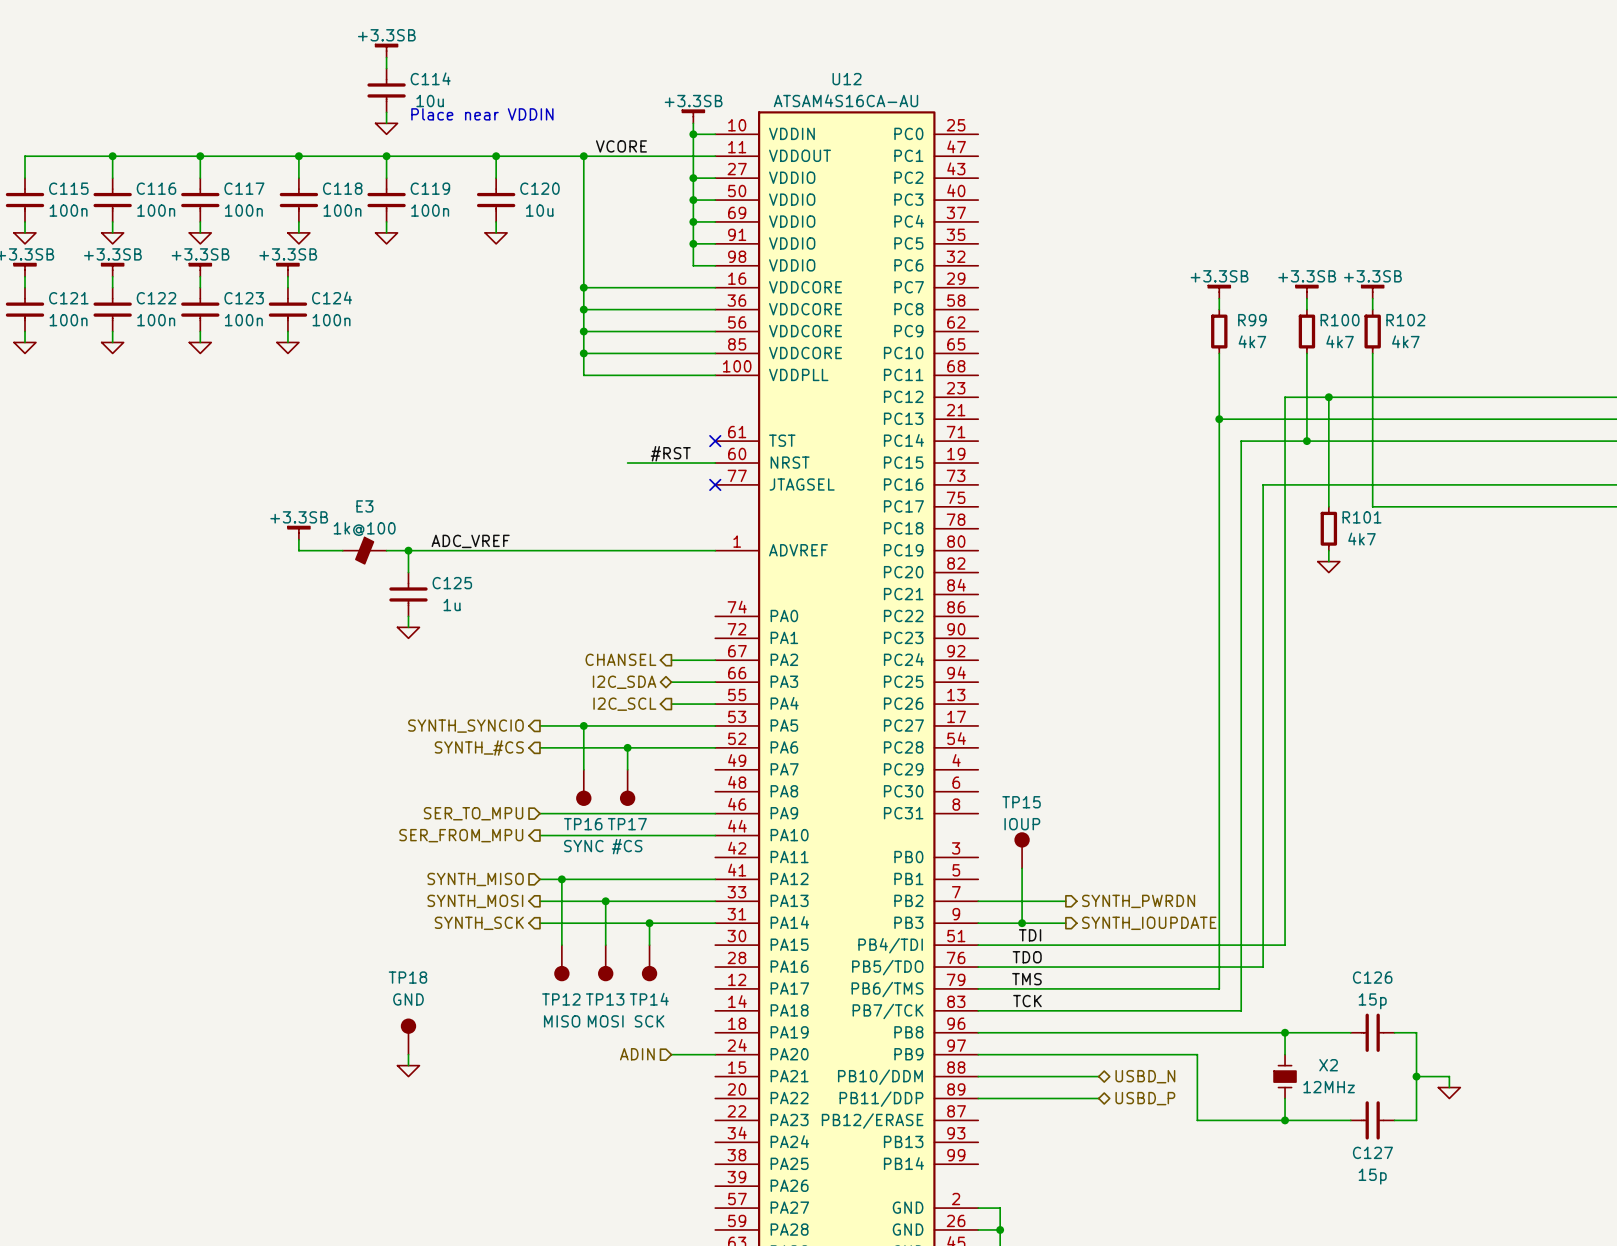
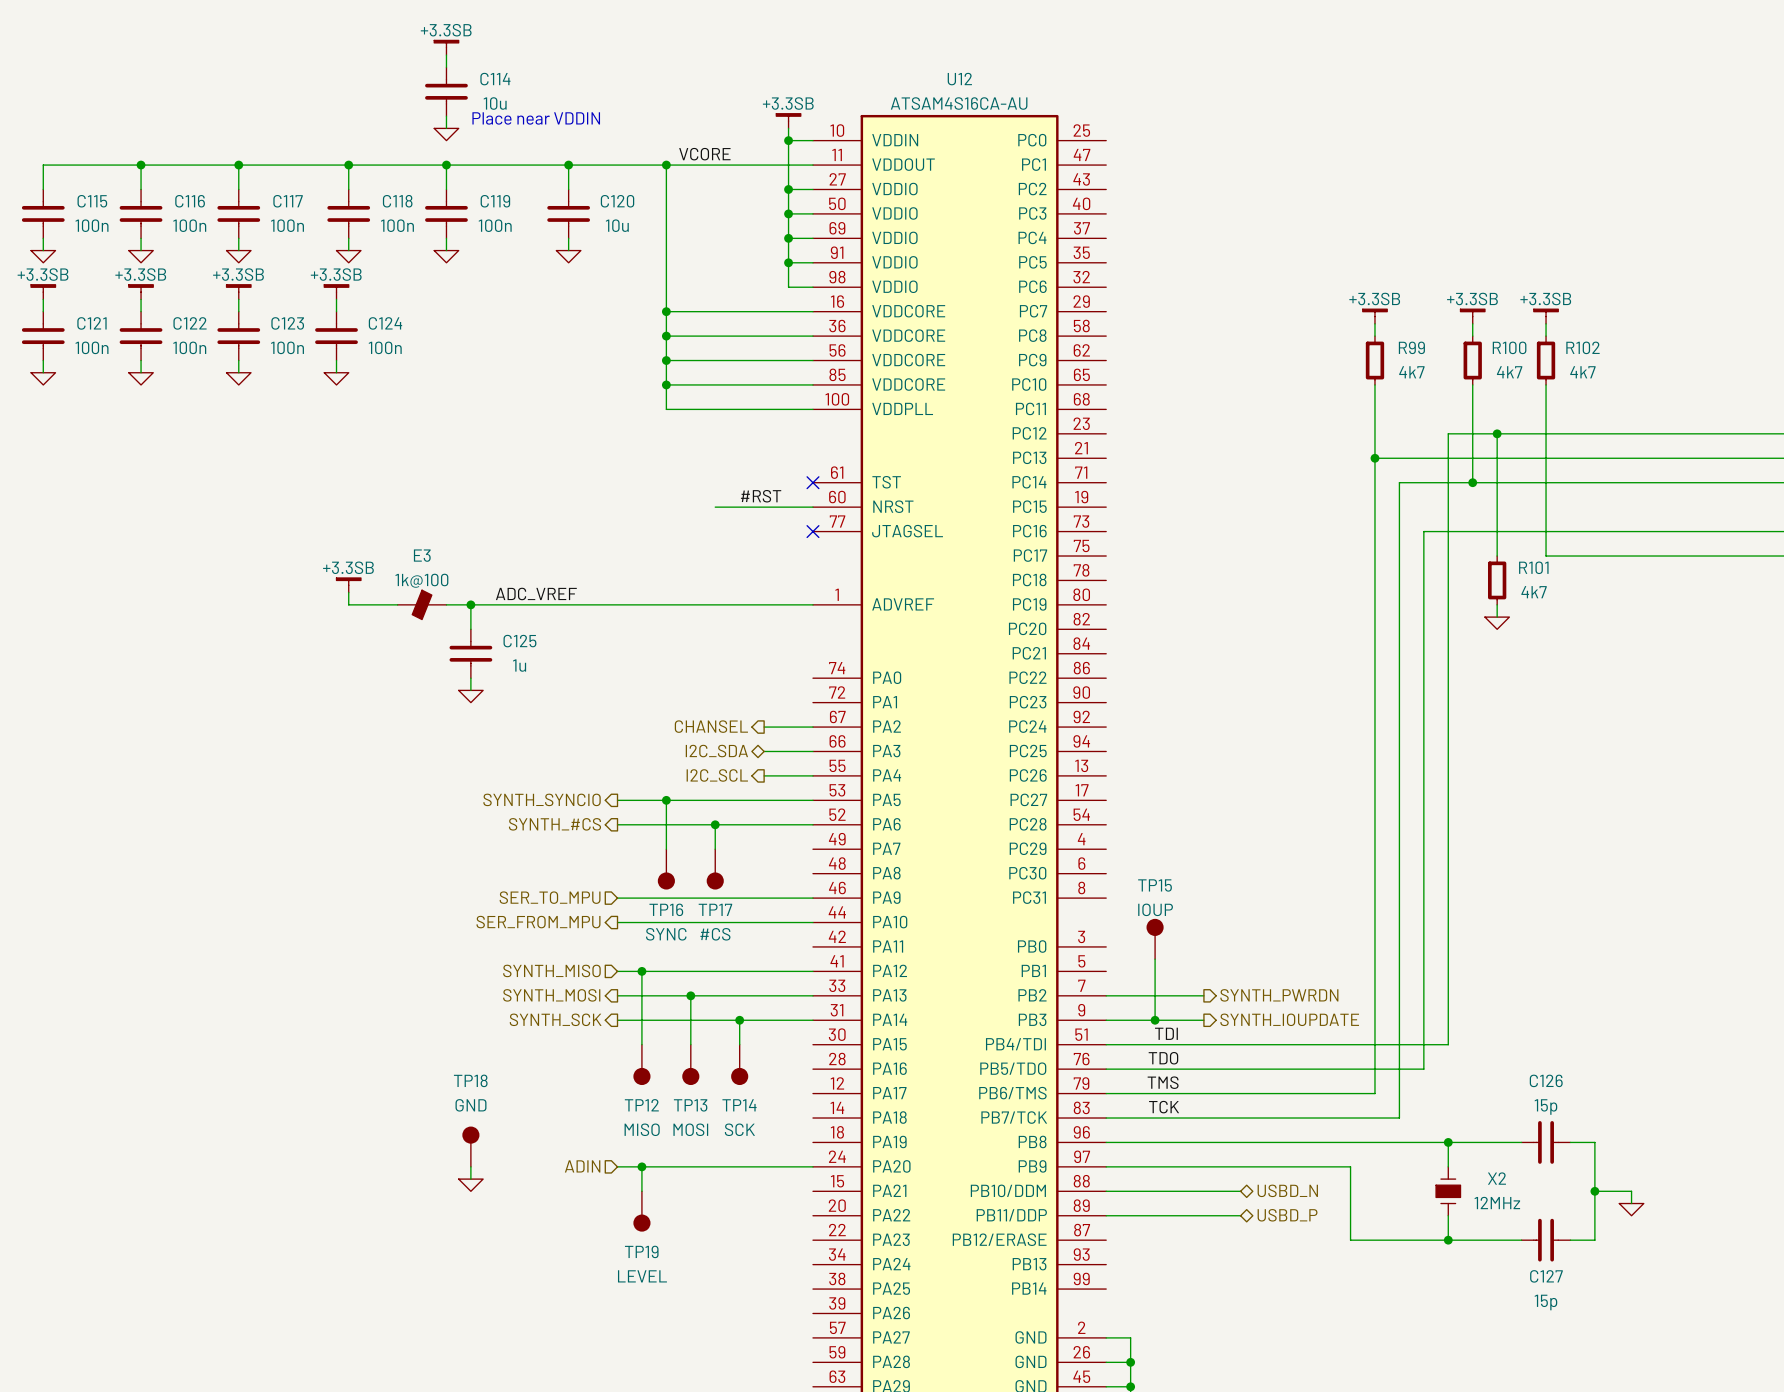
wire: none -> (617, 1166) (764, 1166)
wire: none -> (641, 1166) (641, 1191)
junction: none -> (641, 1166)
hierarchical label position: ADIN (637, 1054) -> ADIN (582, 1166)
TP19: none -> LEVEL (641, 1211)

